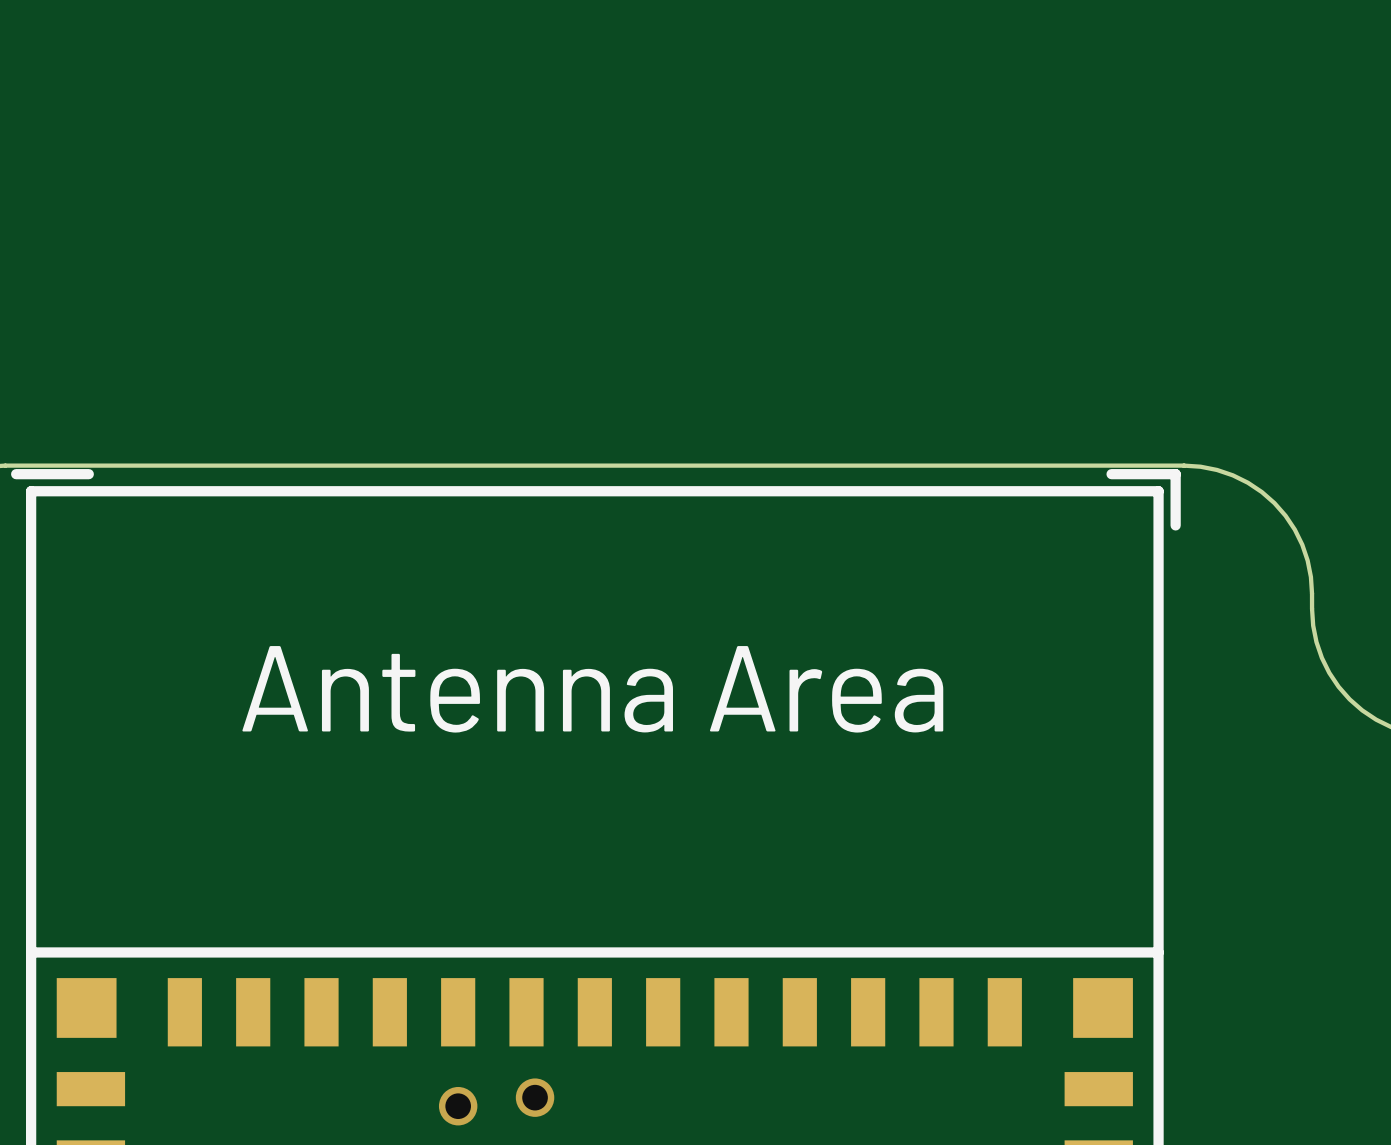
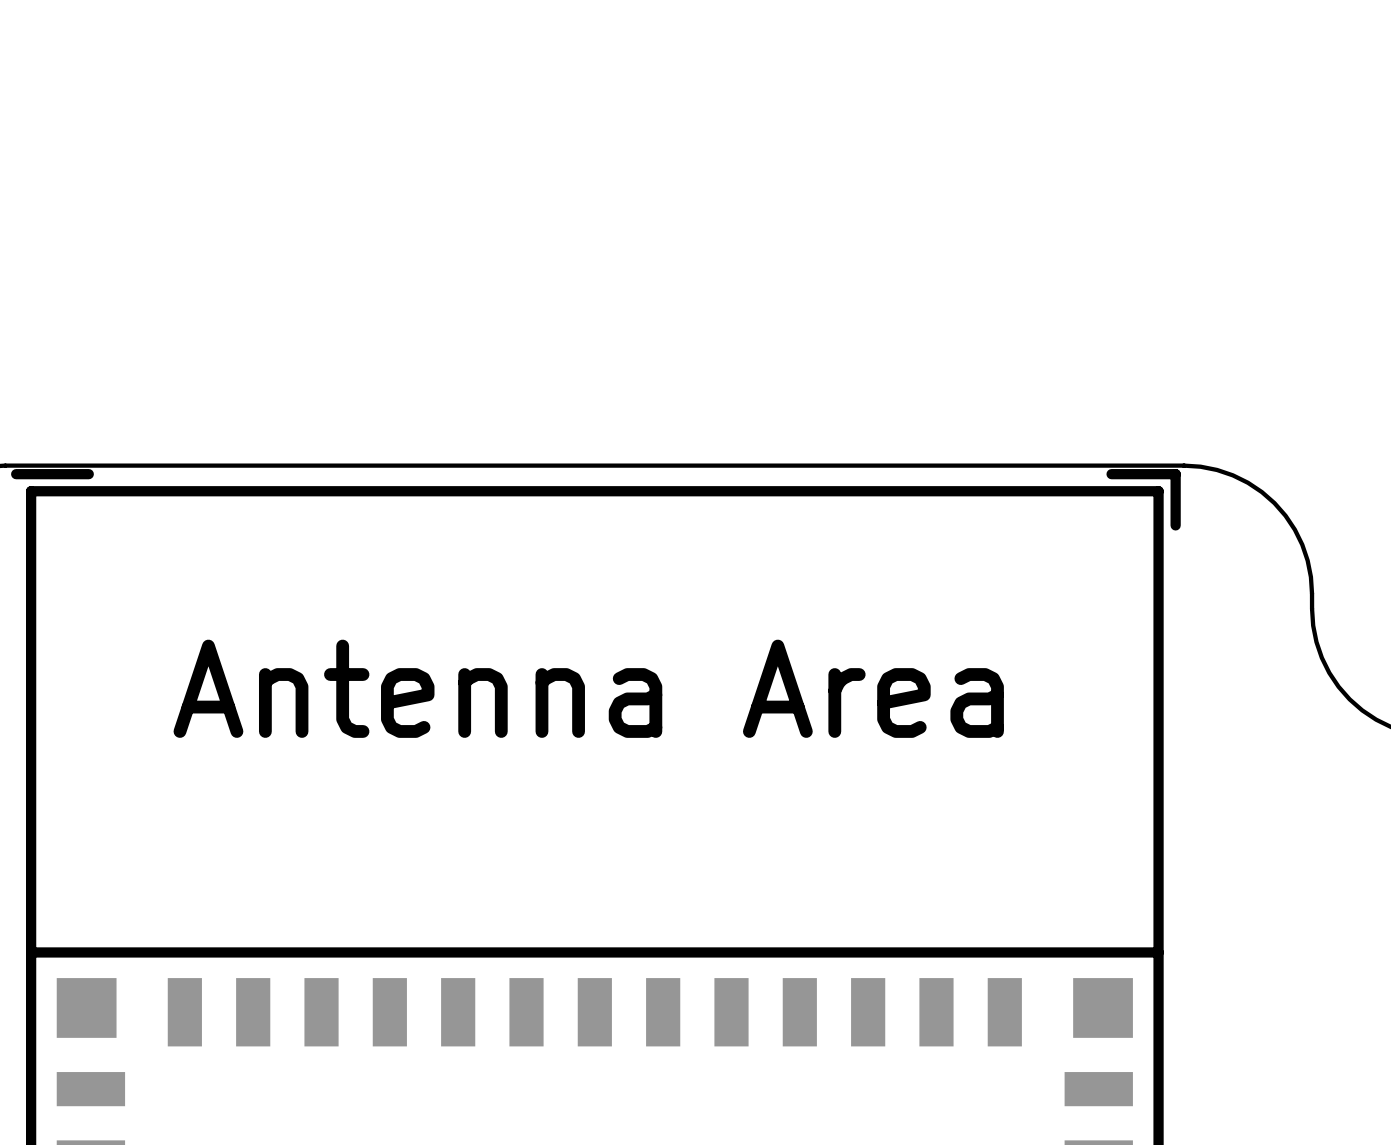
via: (535, 1097) -> none
via: (458, 1106) -> none

